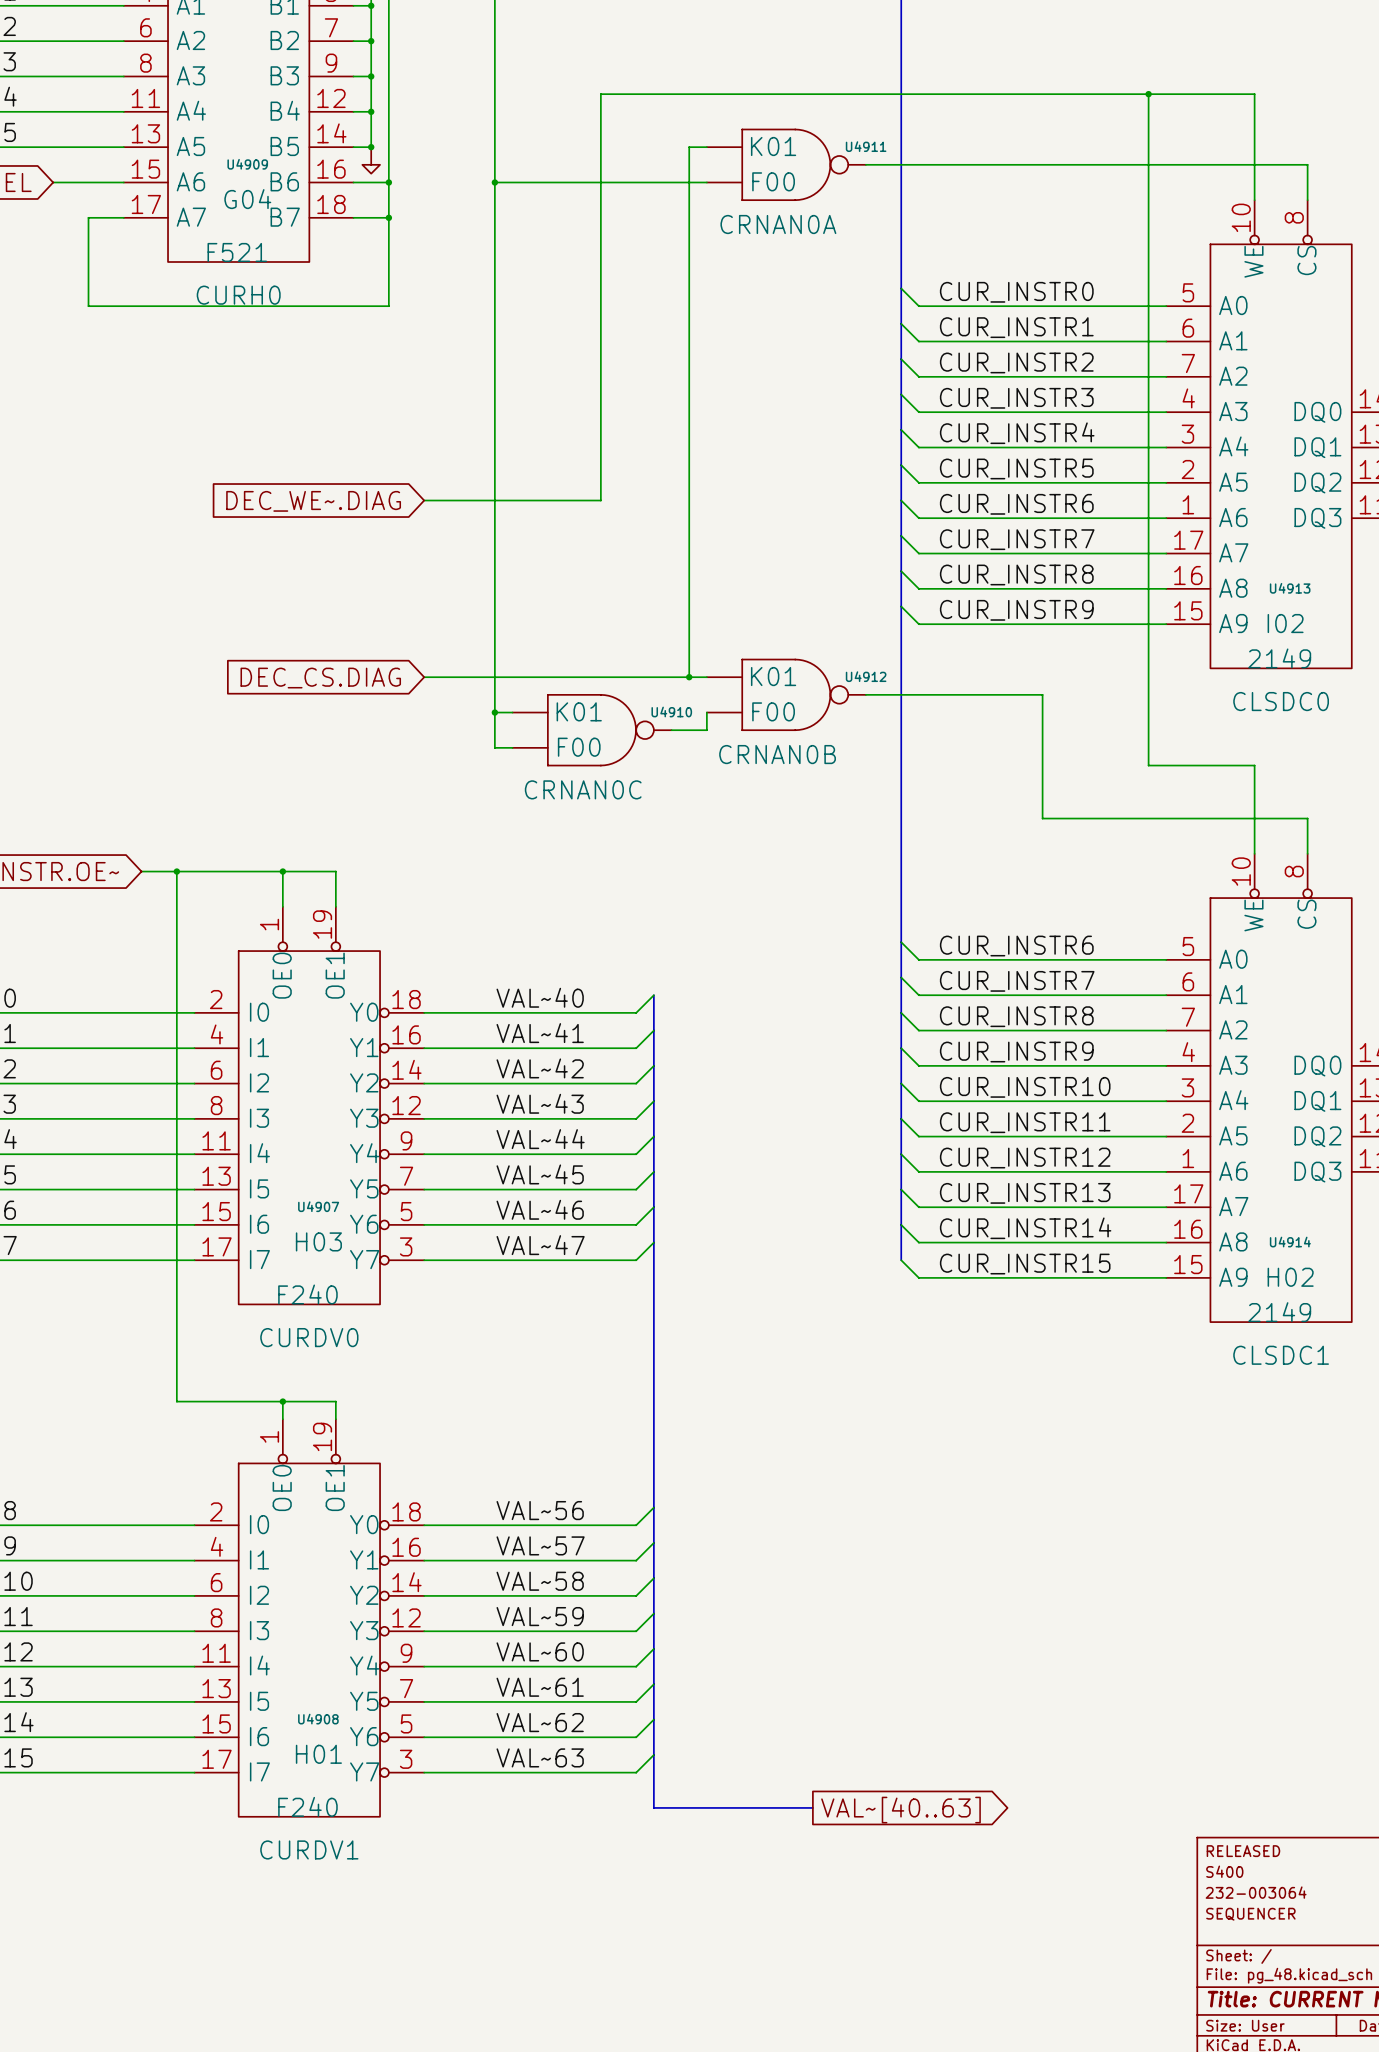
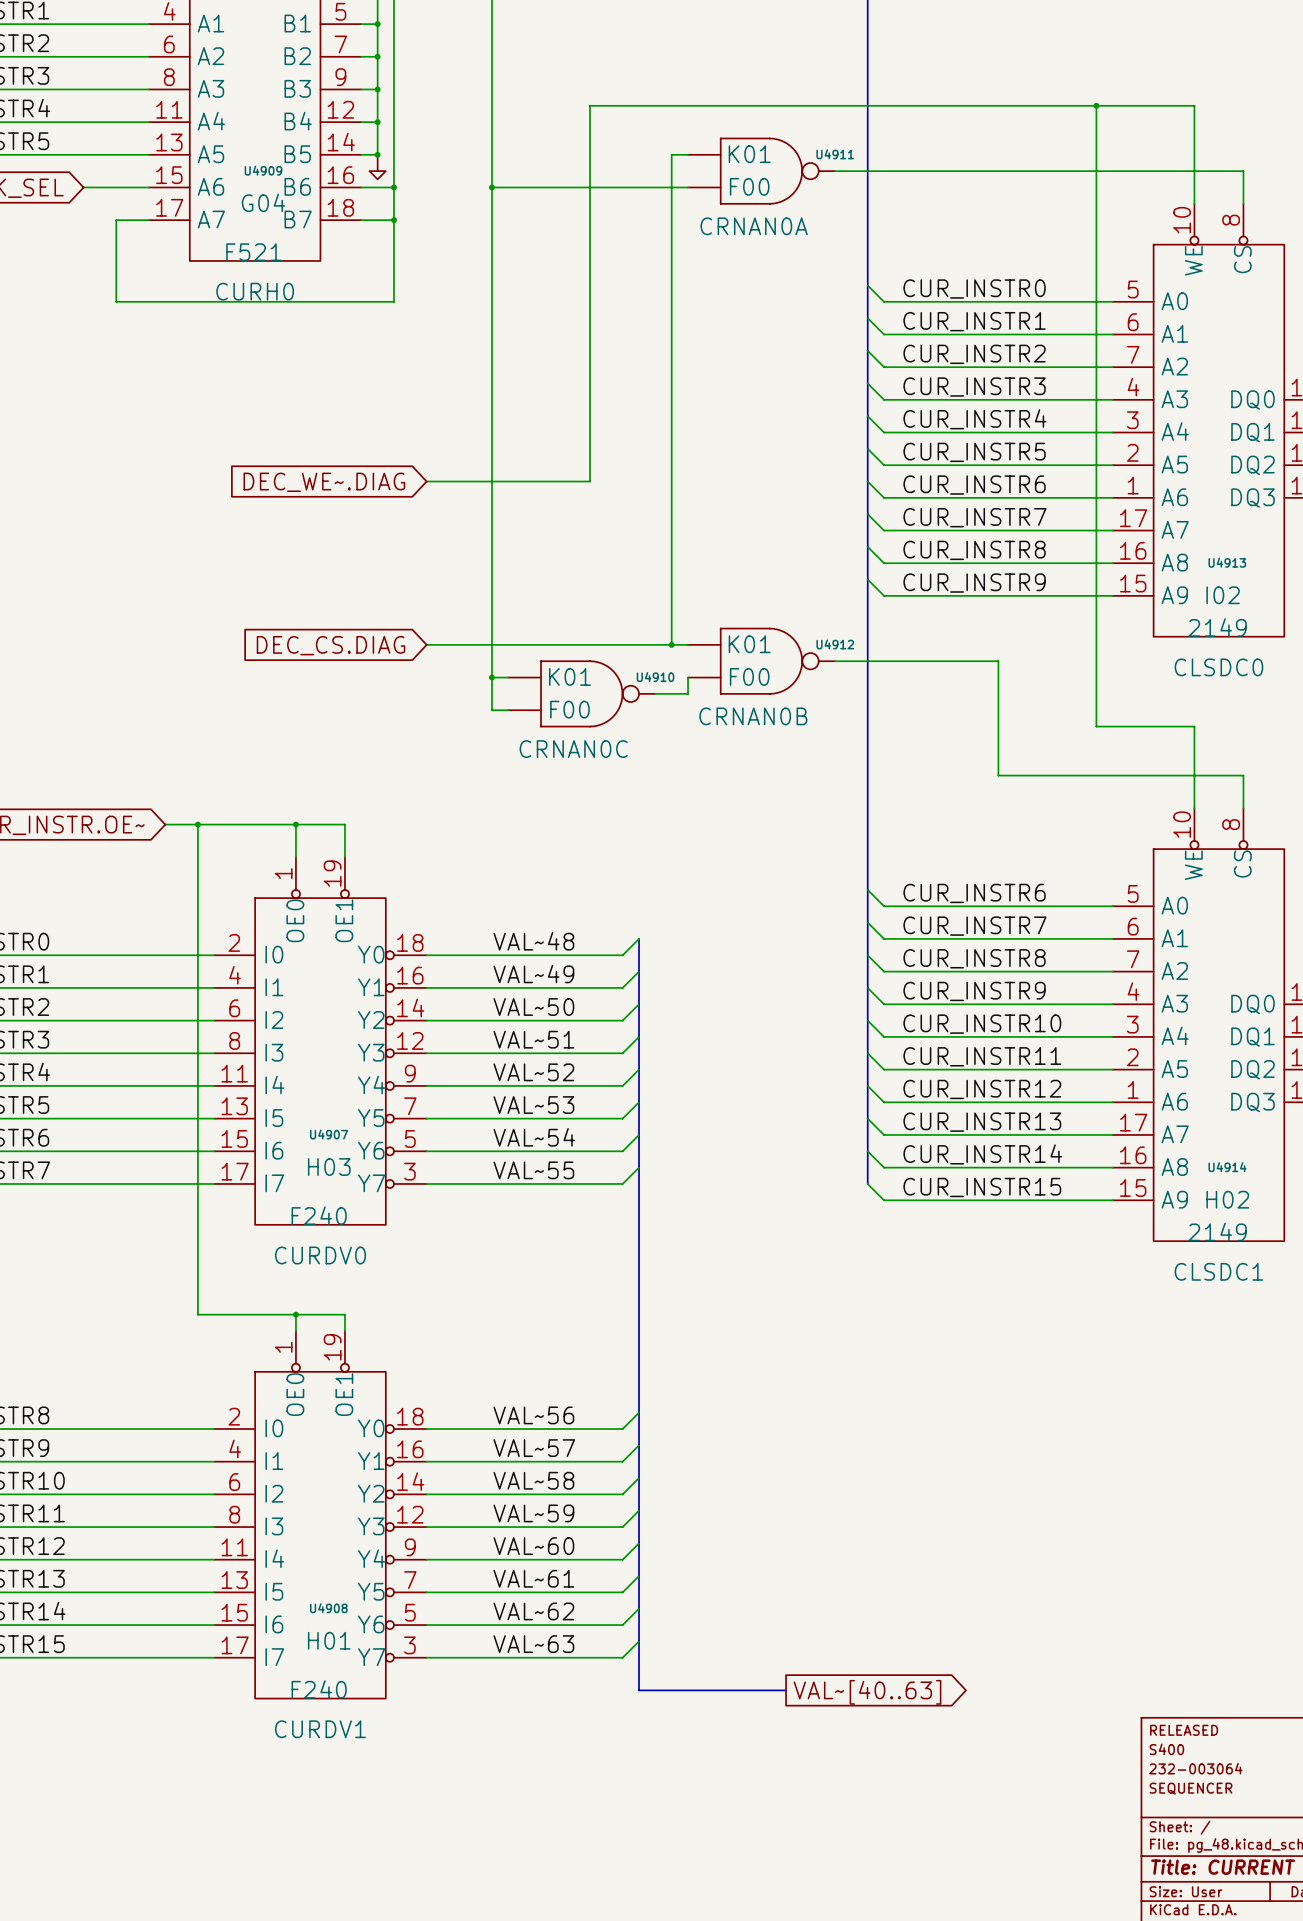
label: VAL~40 (540, 997) -> VAL~48 (533, 941)
label: VAL~41 (540, 1033) -> VAL~49 (533, 973)
label: VAL~42 (540, 1068) -> VAL~50 (533, 1007)
label: VAL~43 (540, 1103) -> VAL~51 (533, 1039)
label: VAL~44 (540, 1139) -> VAL~52 (533, 1072)
label: VAL~45 (540, 1174) -> VAL~53 (533, 1105)
label: VAL~46 (540, 1209) -> VAL~54 (534, 1137)
label: VAL~47 (540, 1245) -> VAL~55 (533, 1170)

